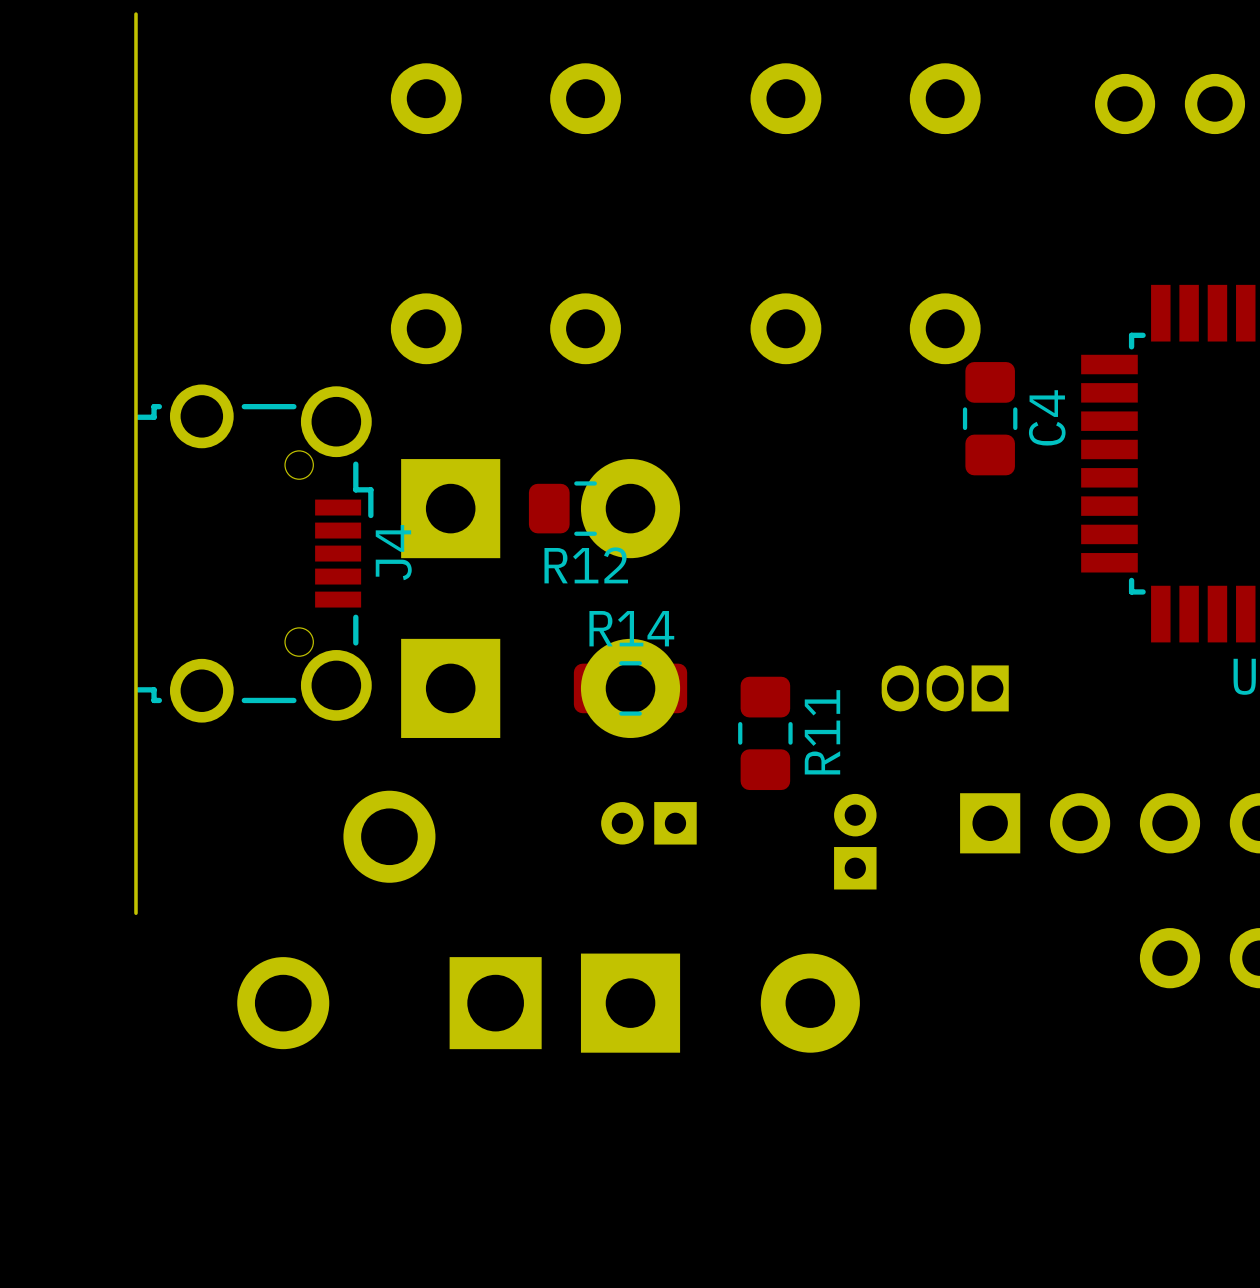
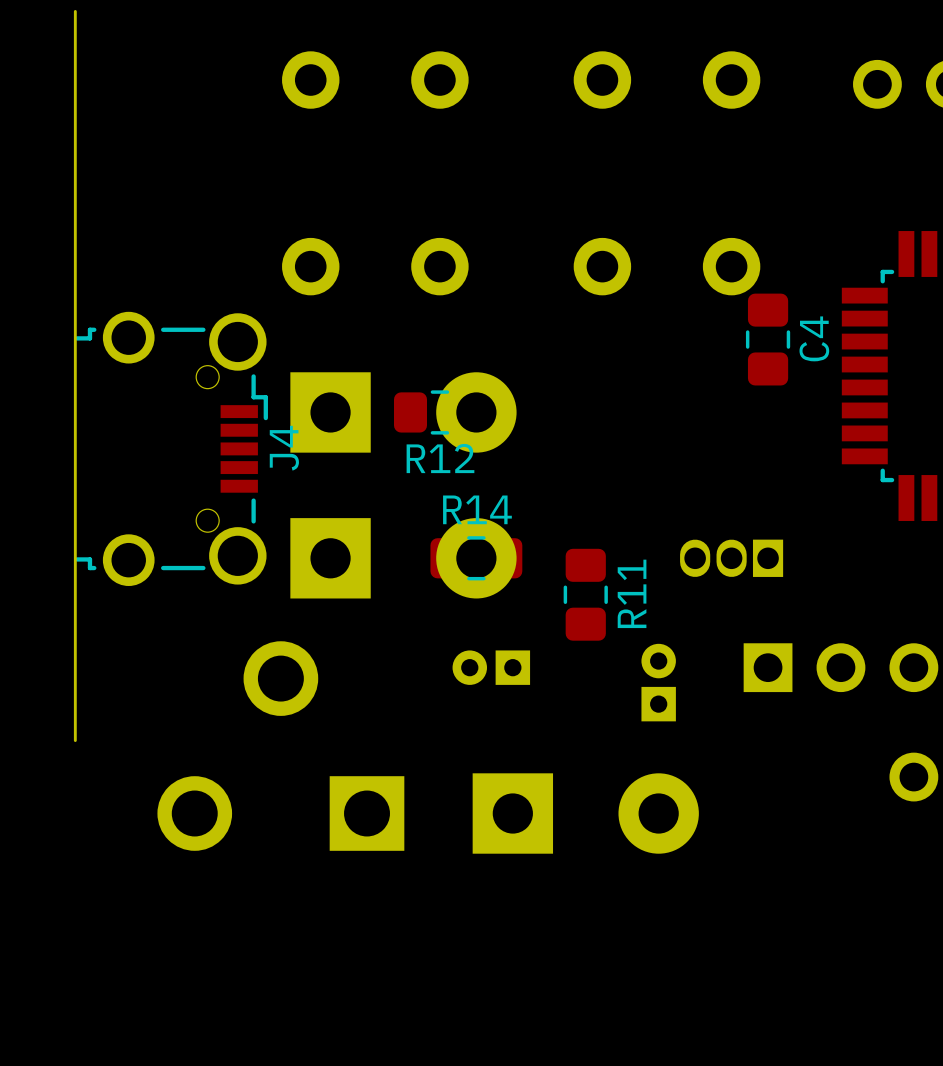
part position: (720, 1003) -> (585, 813)

